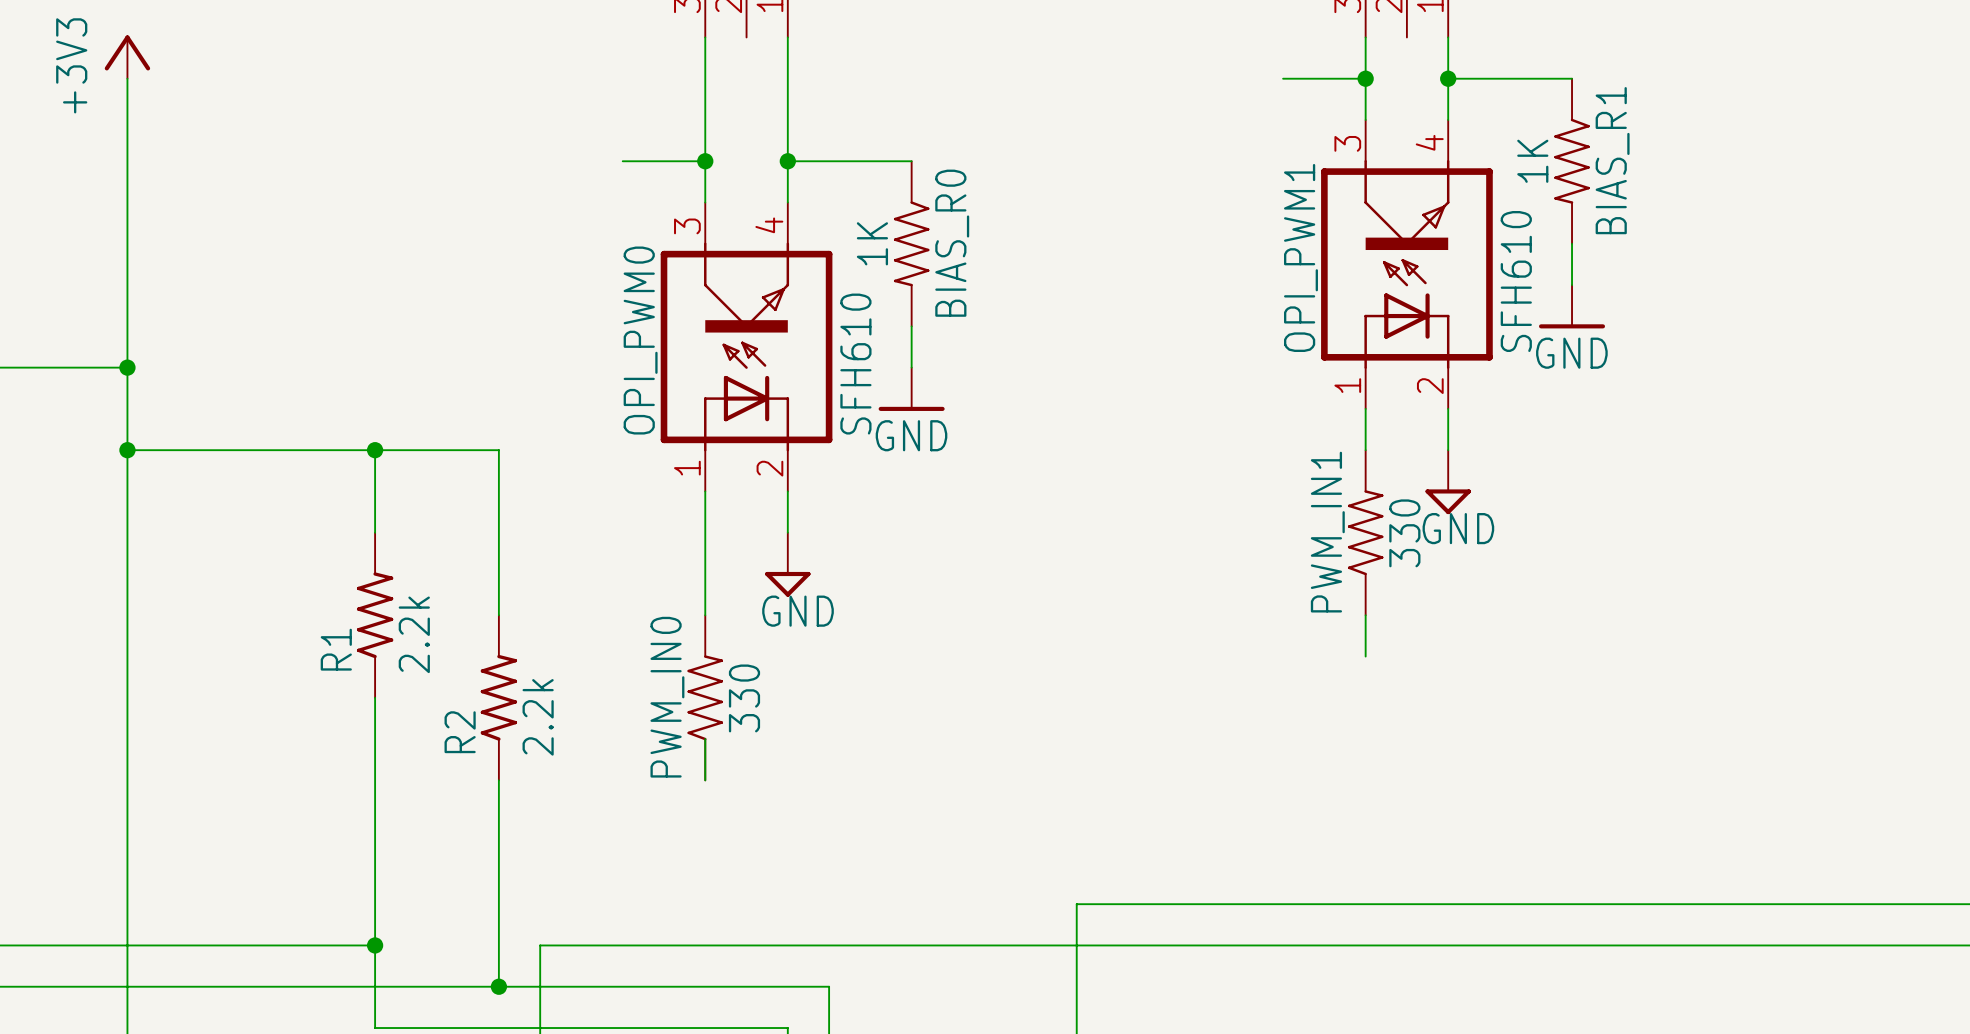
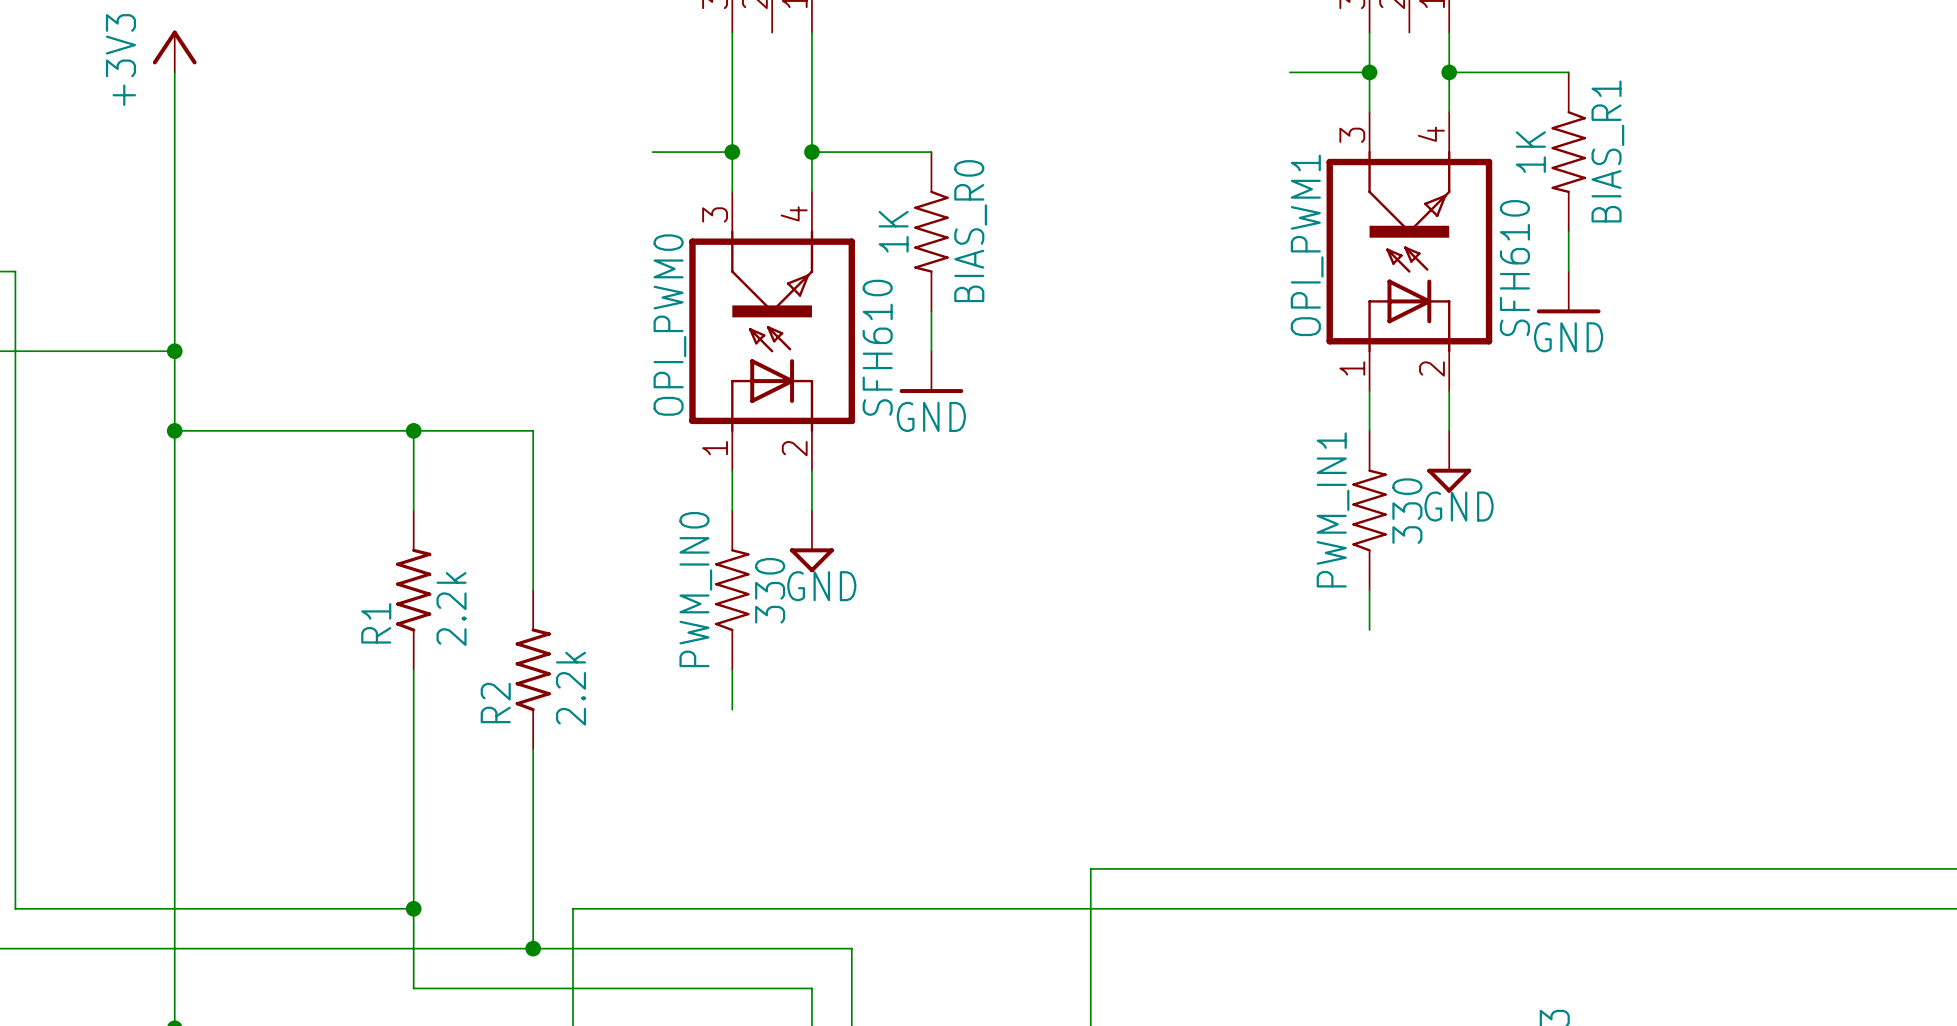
PWM_IN0 position: (705, 697) -> (732, 590)
wire: (705, 739) (705, 780) -> (732, 709) (732, 669)

